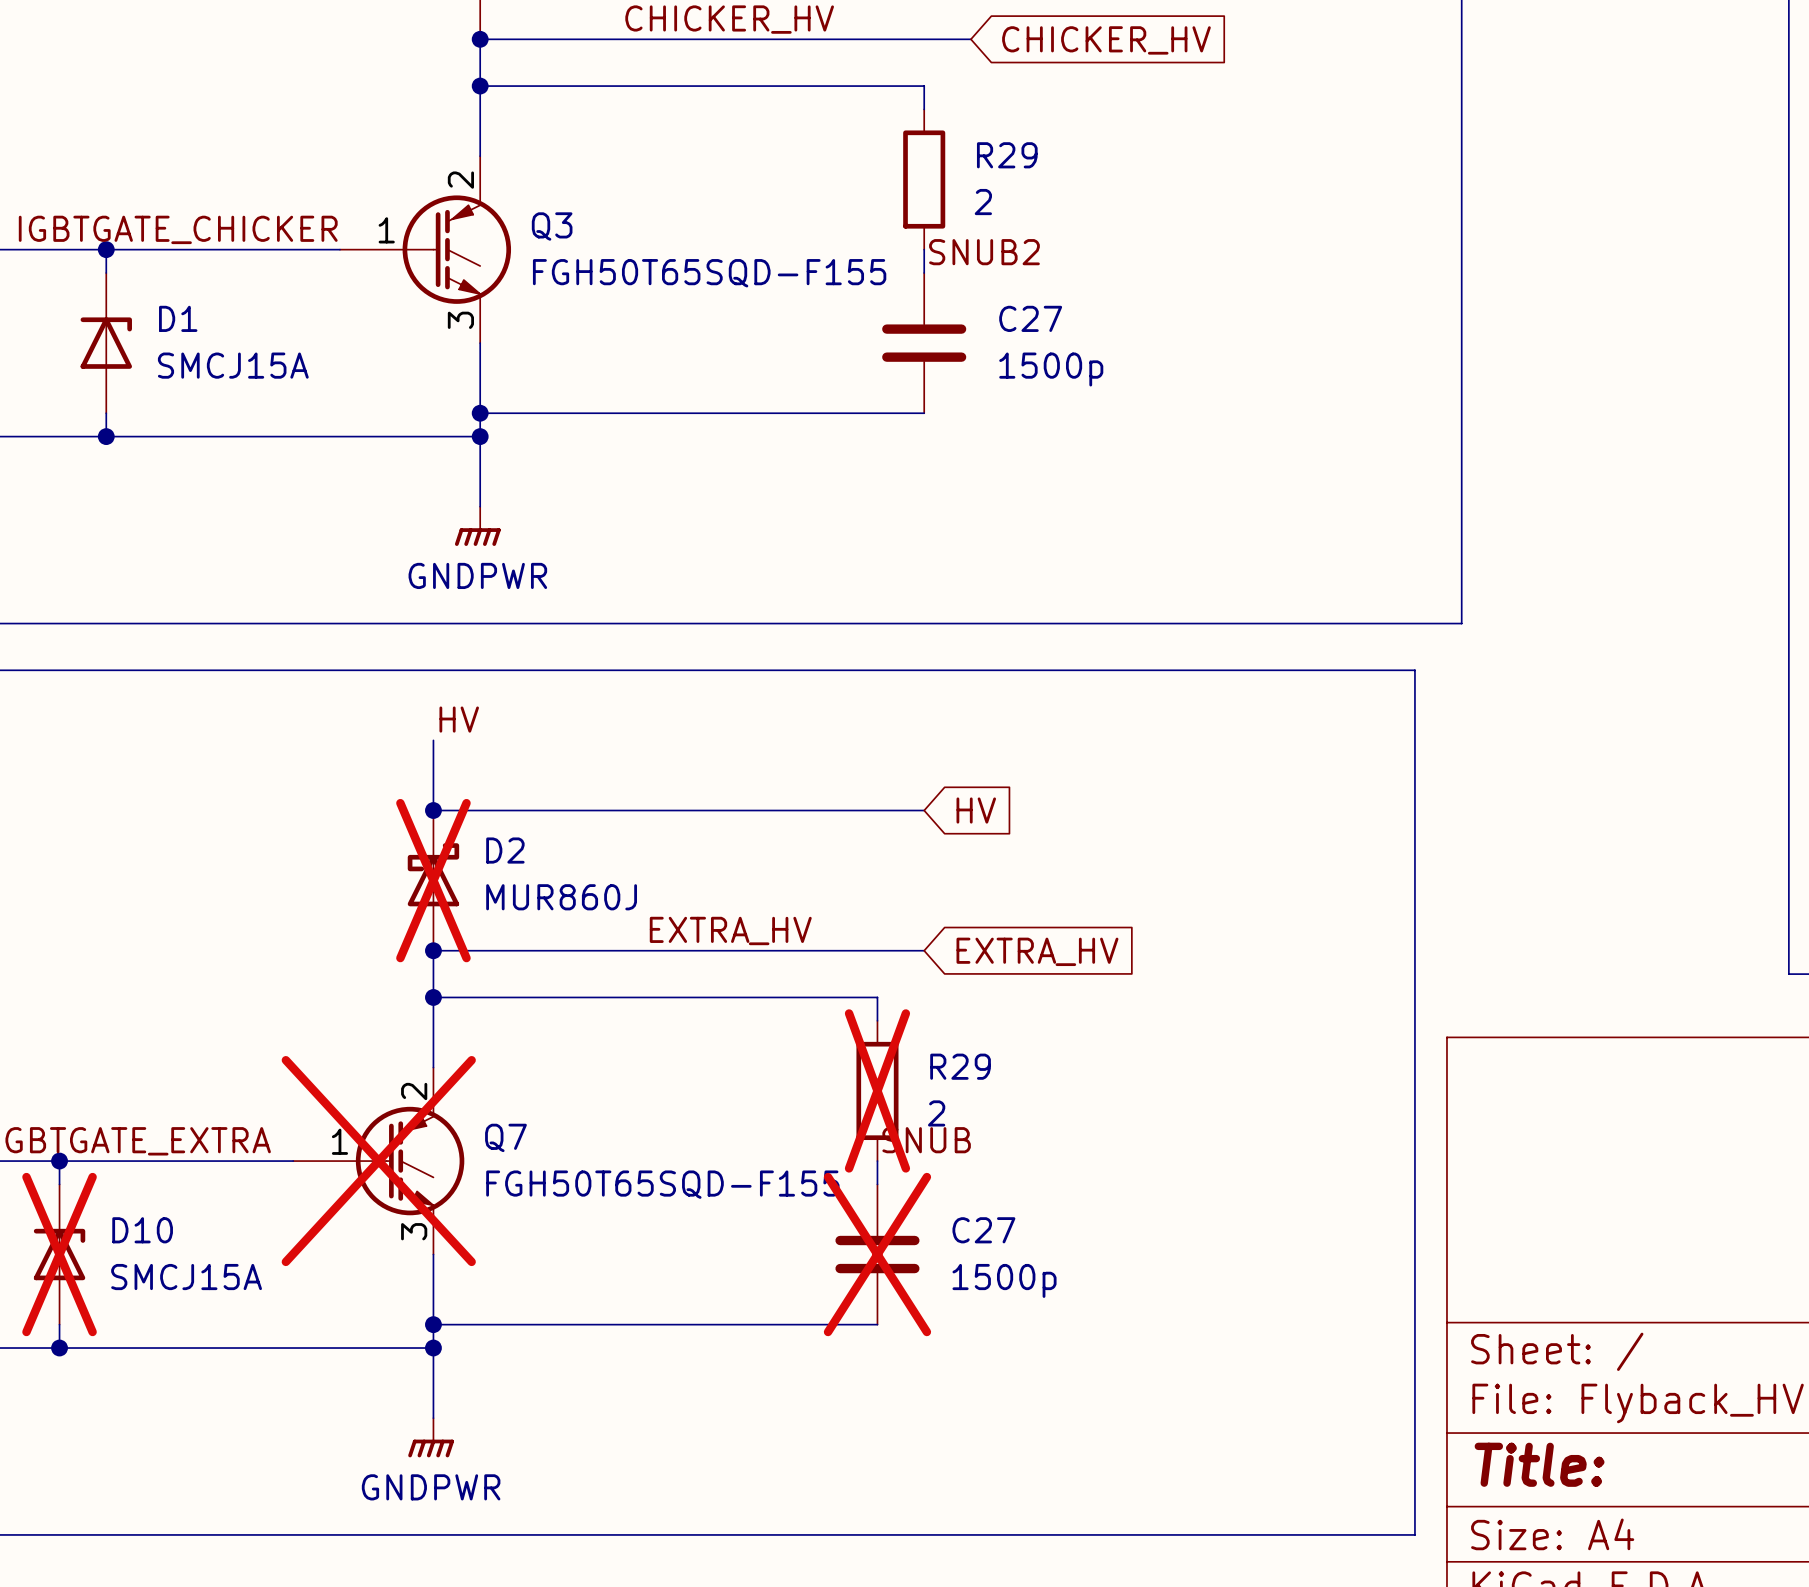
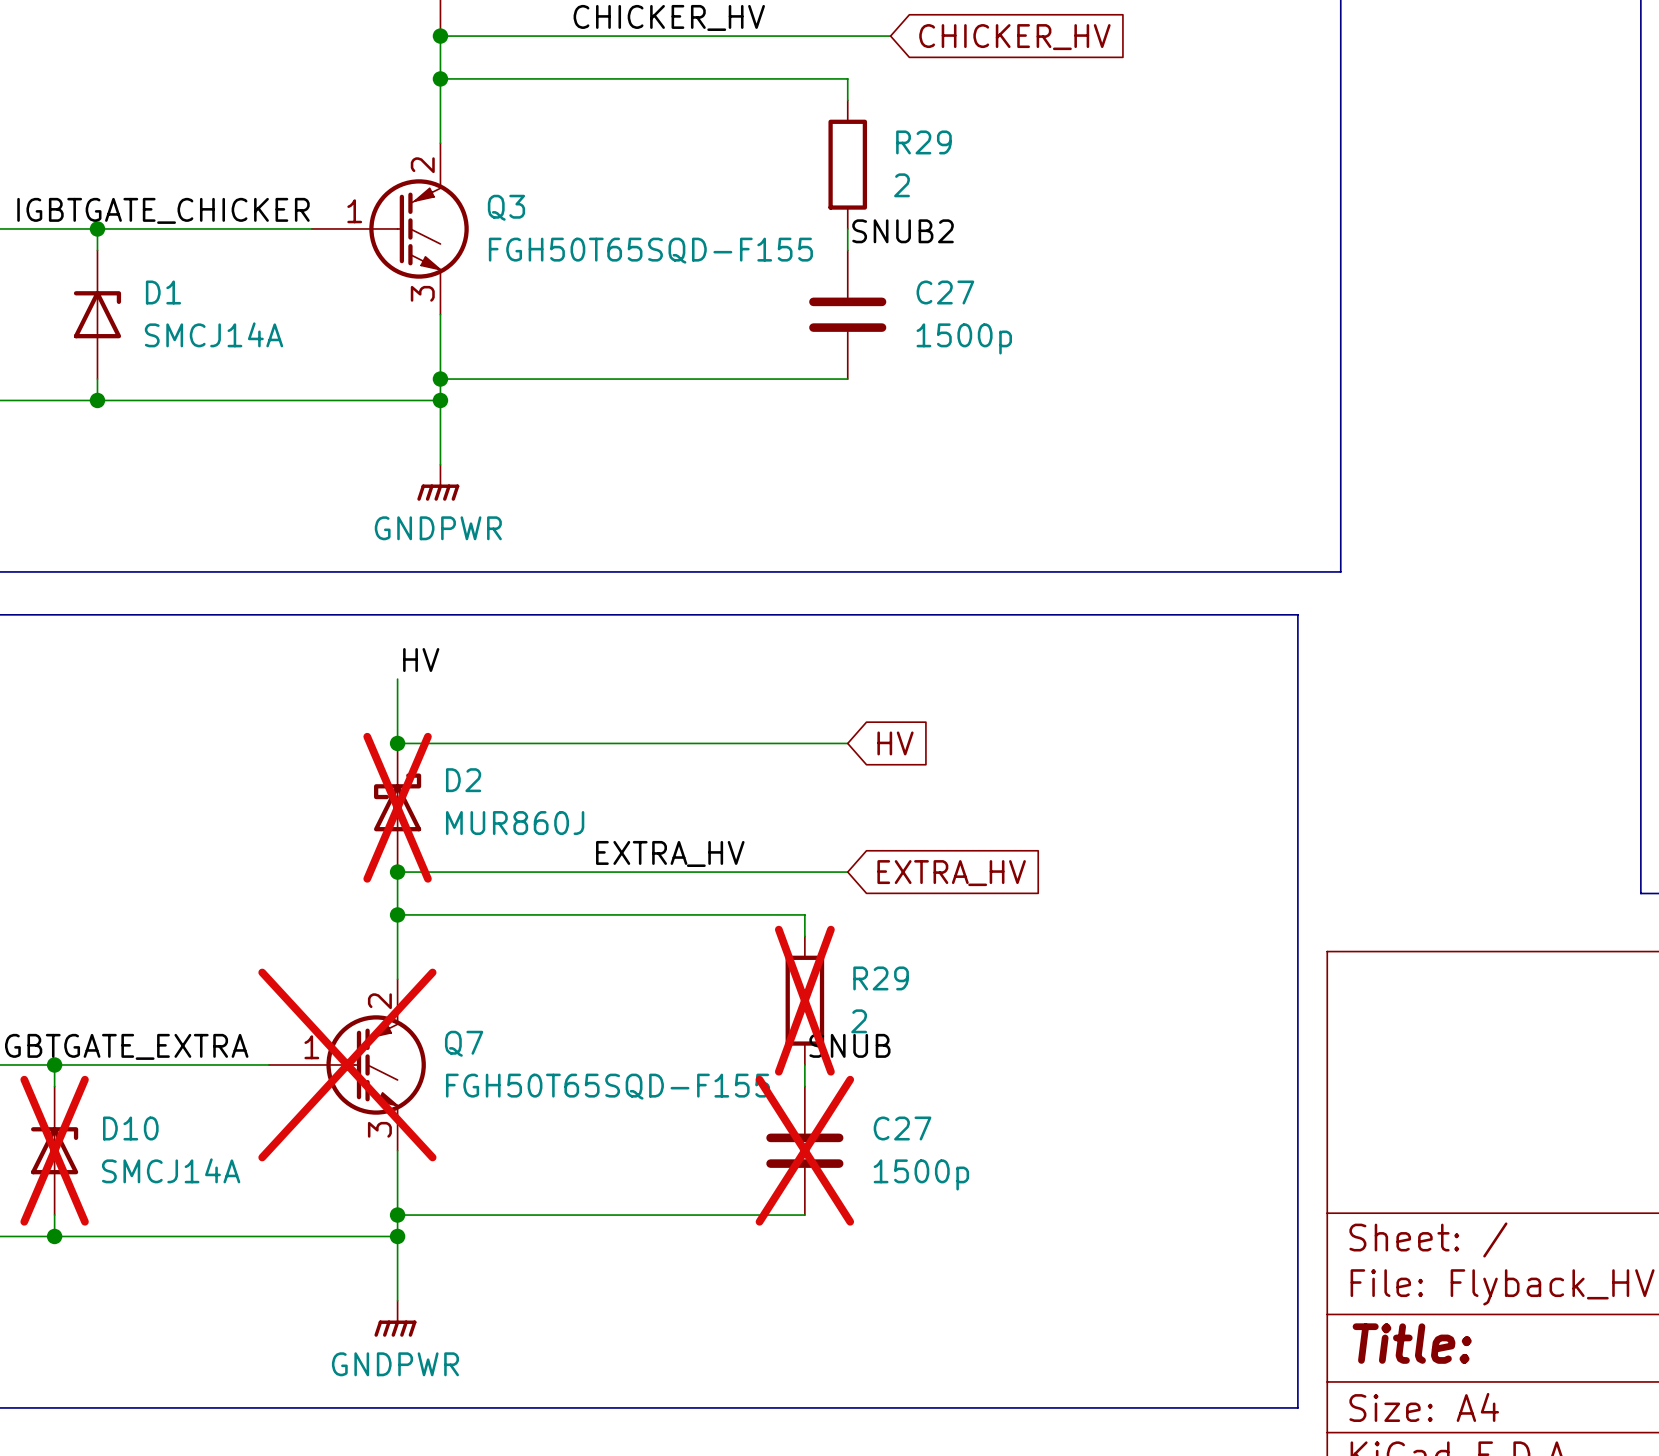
D1 value: SMCJ15A (233, 365) -> SMCJ14A (214, 334)
D10 value: SMCJ15A (186, 1277) -> SMCJ14A (171, 1170)

